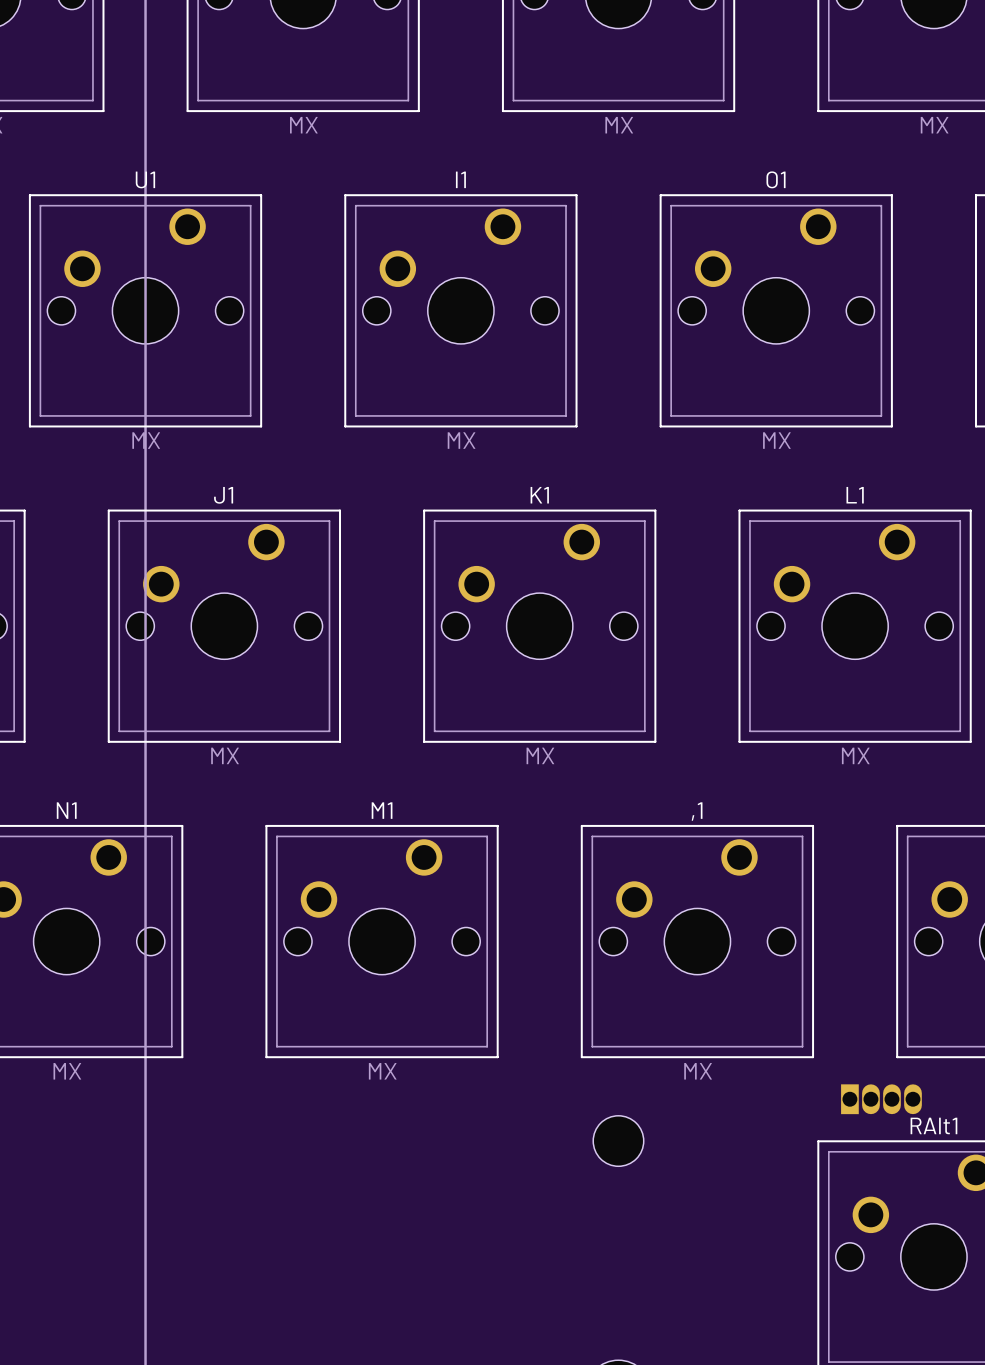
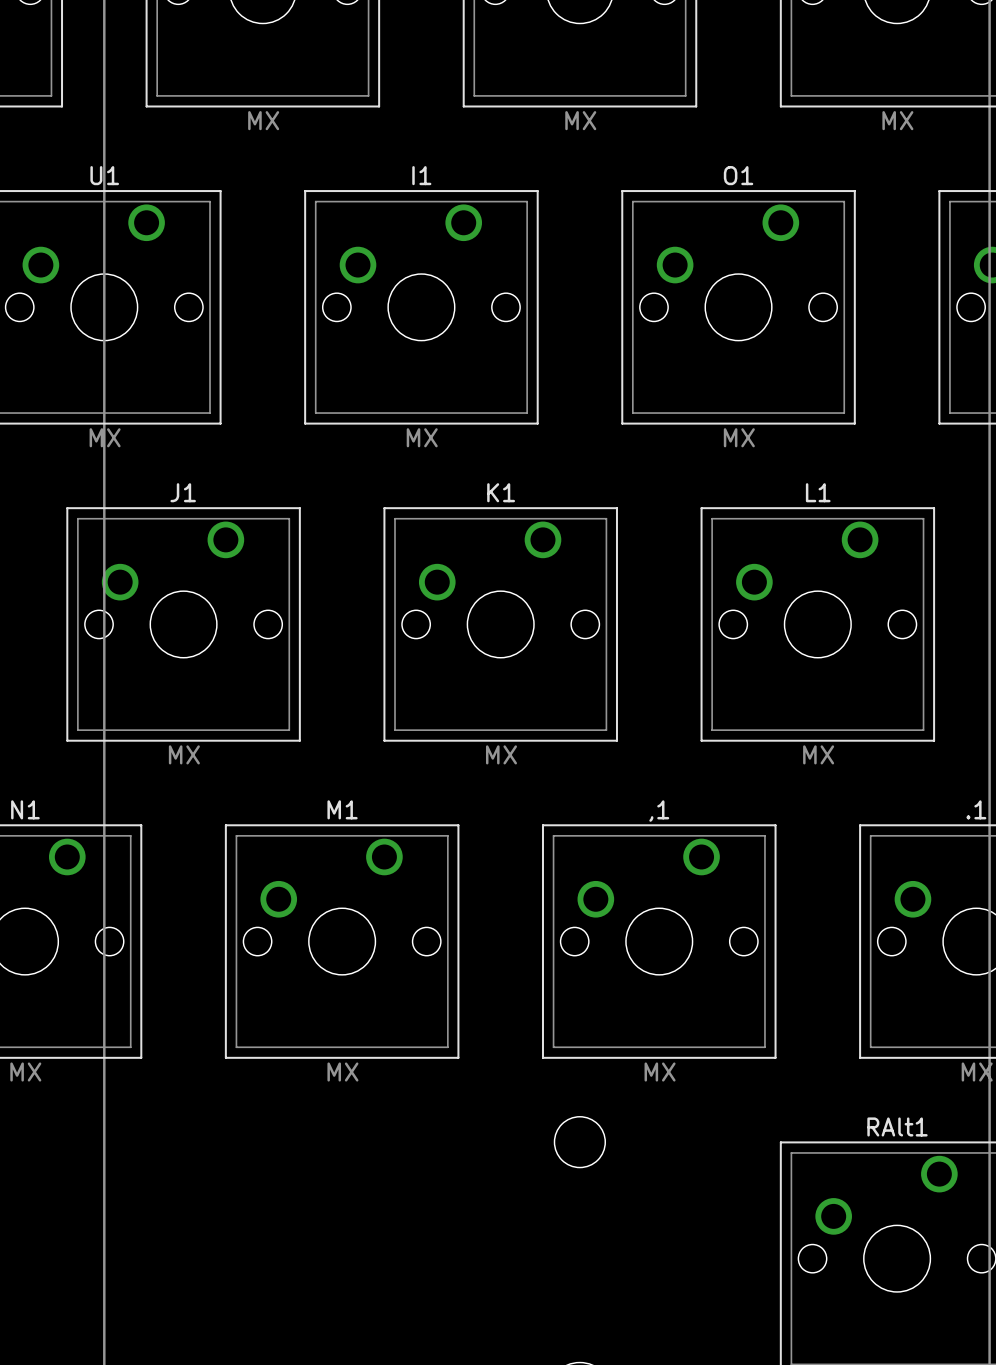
part: (881, 1099) -> none

